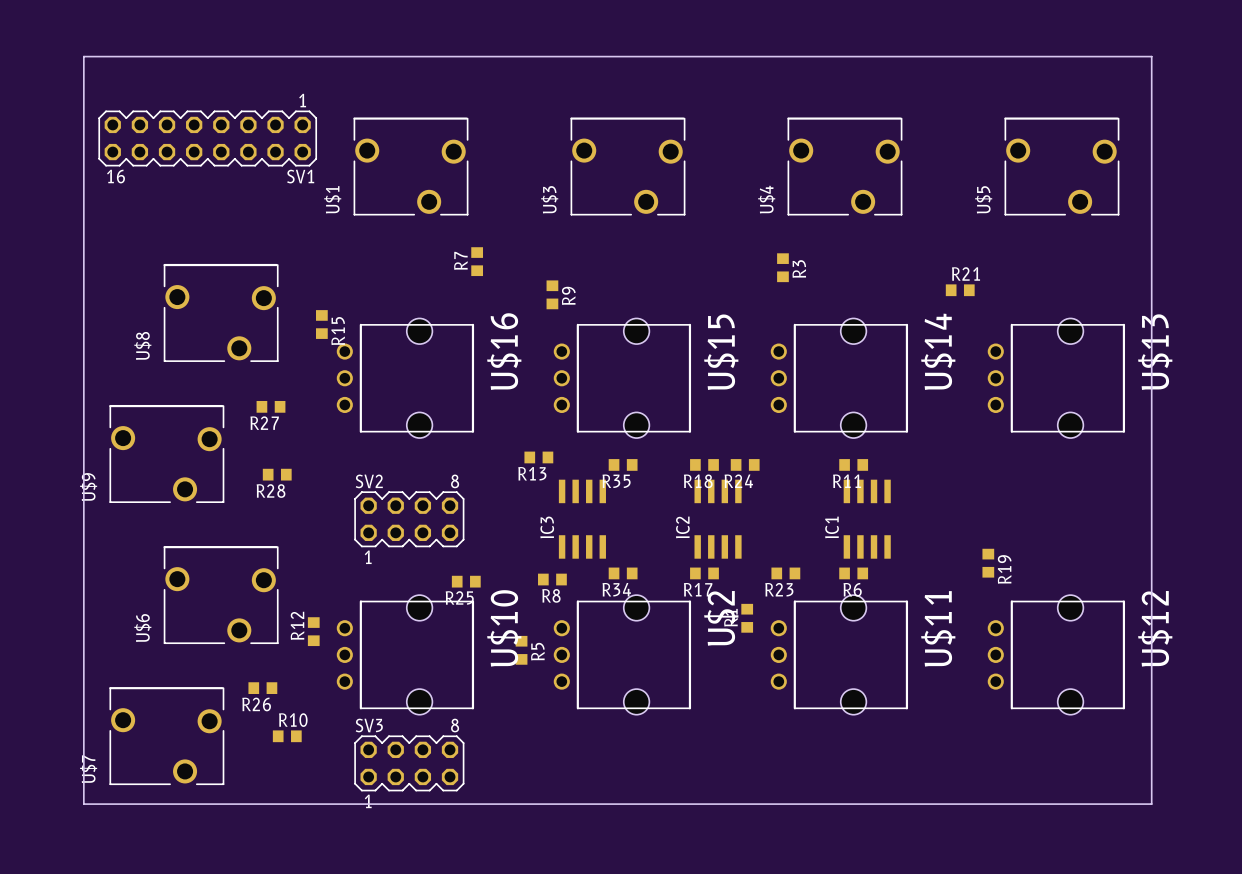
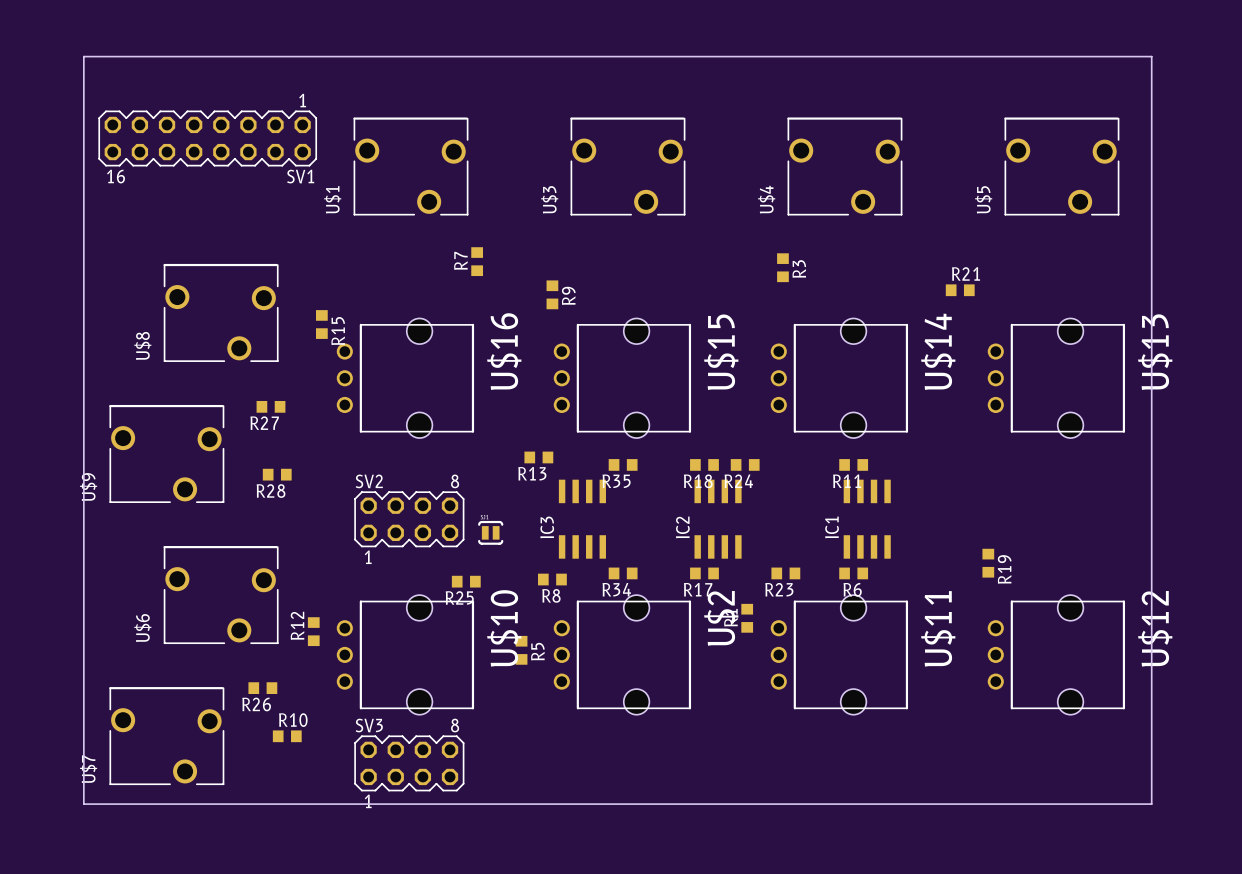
part: none -> (490, 532)

